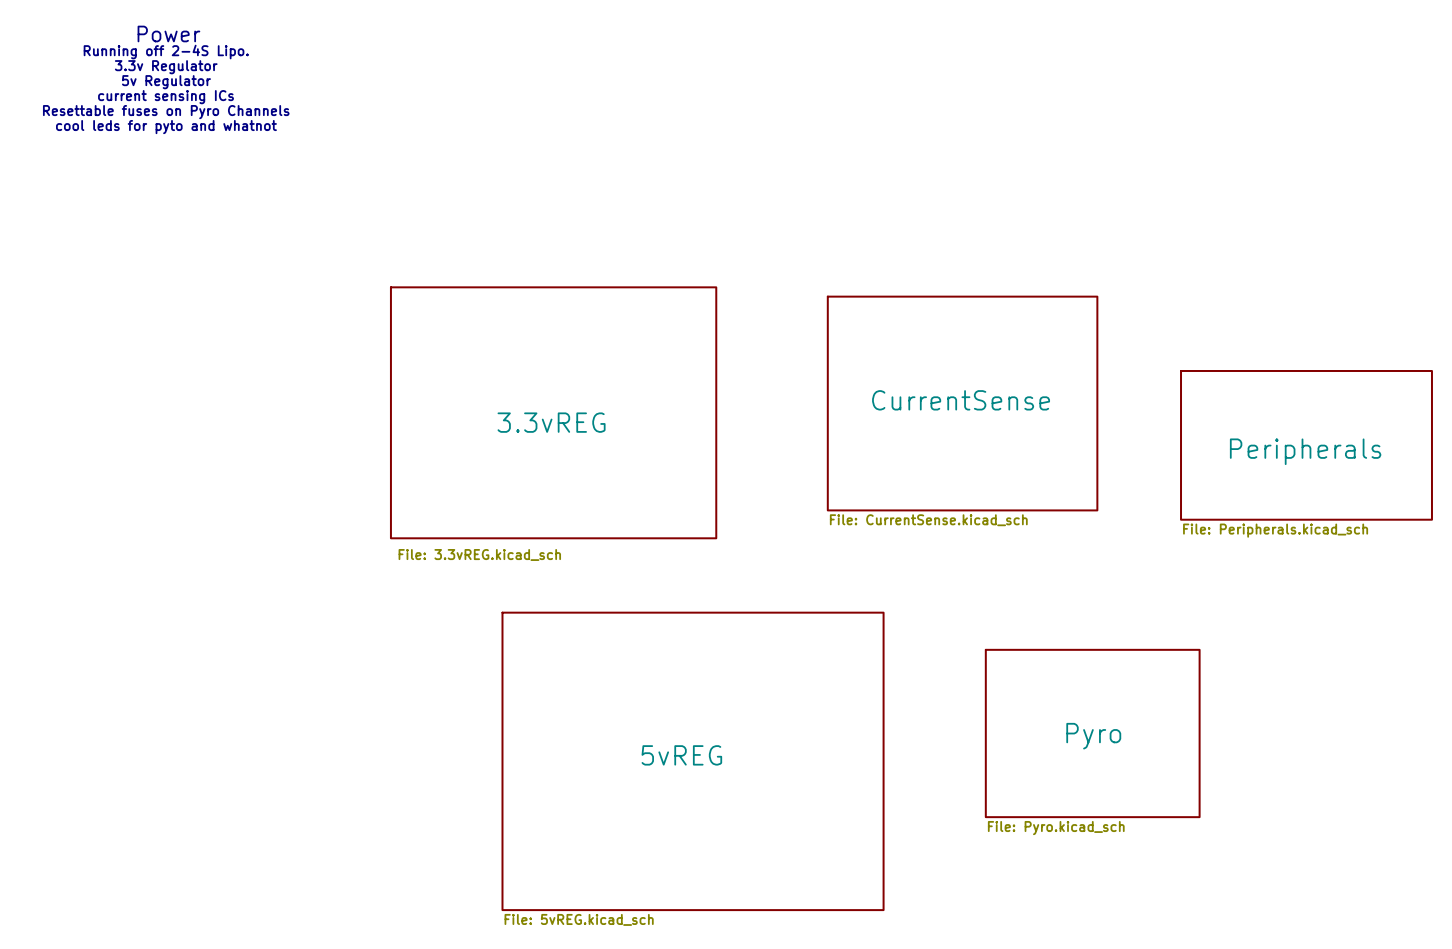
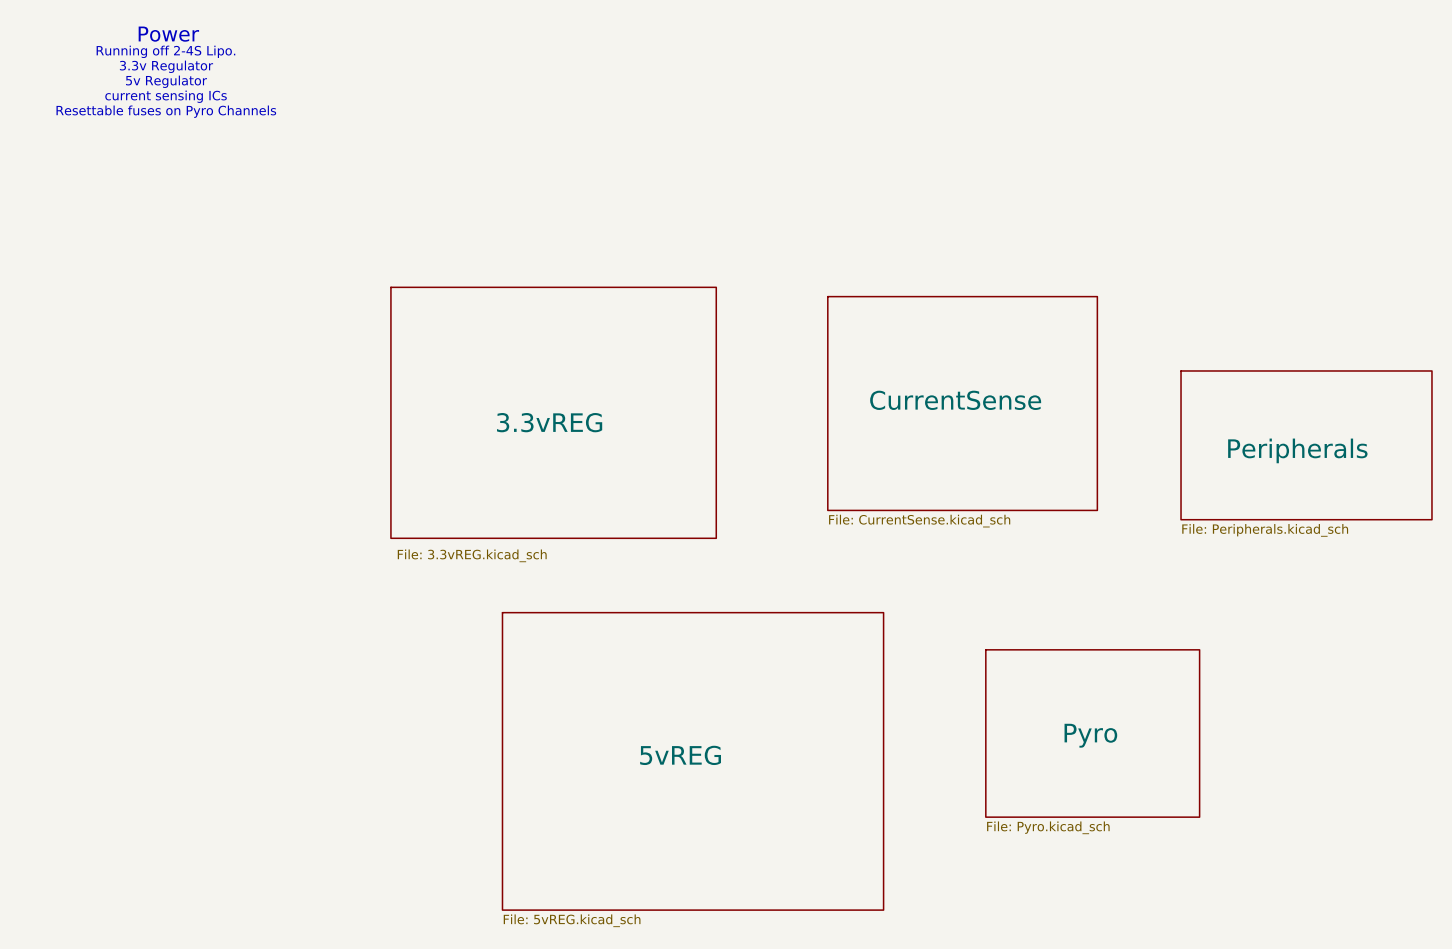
text: cool leds for pyto and whatnot (166, 127) -> none

